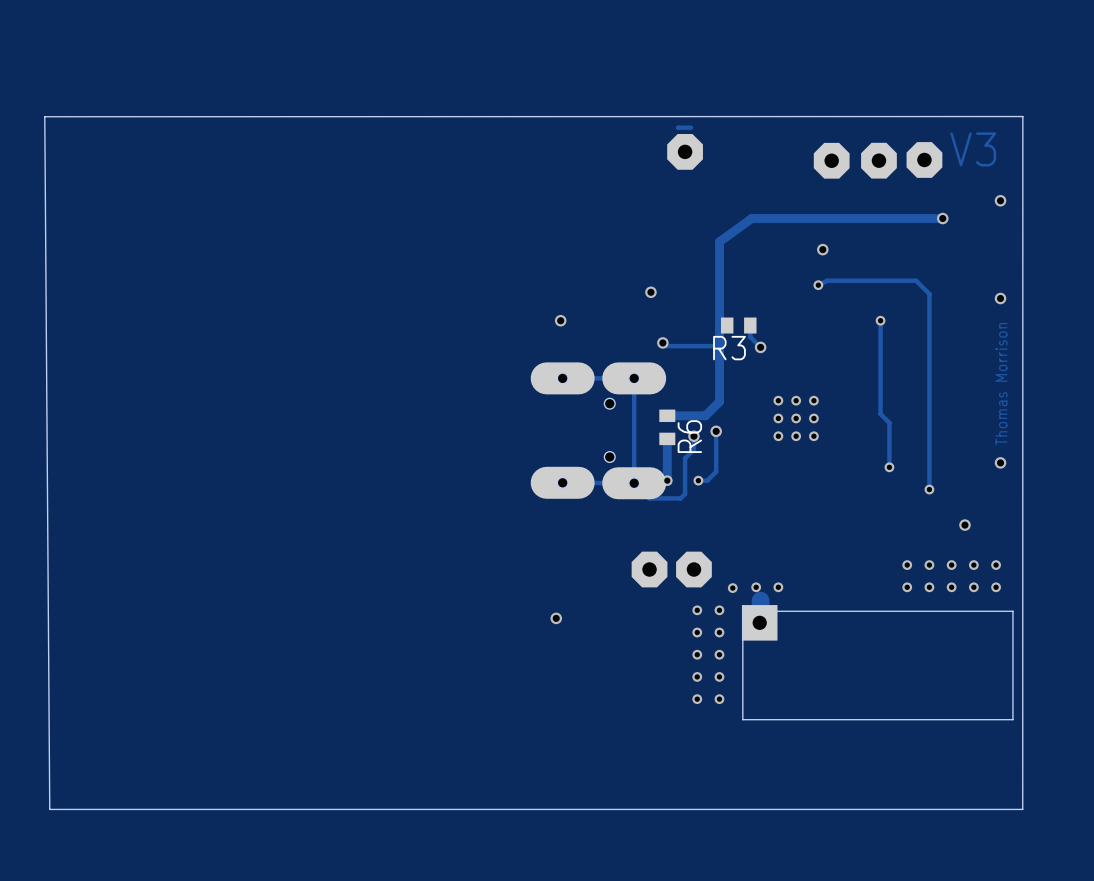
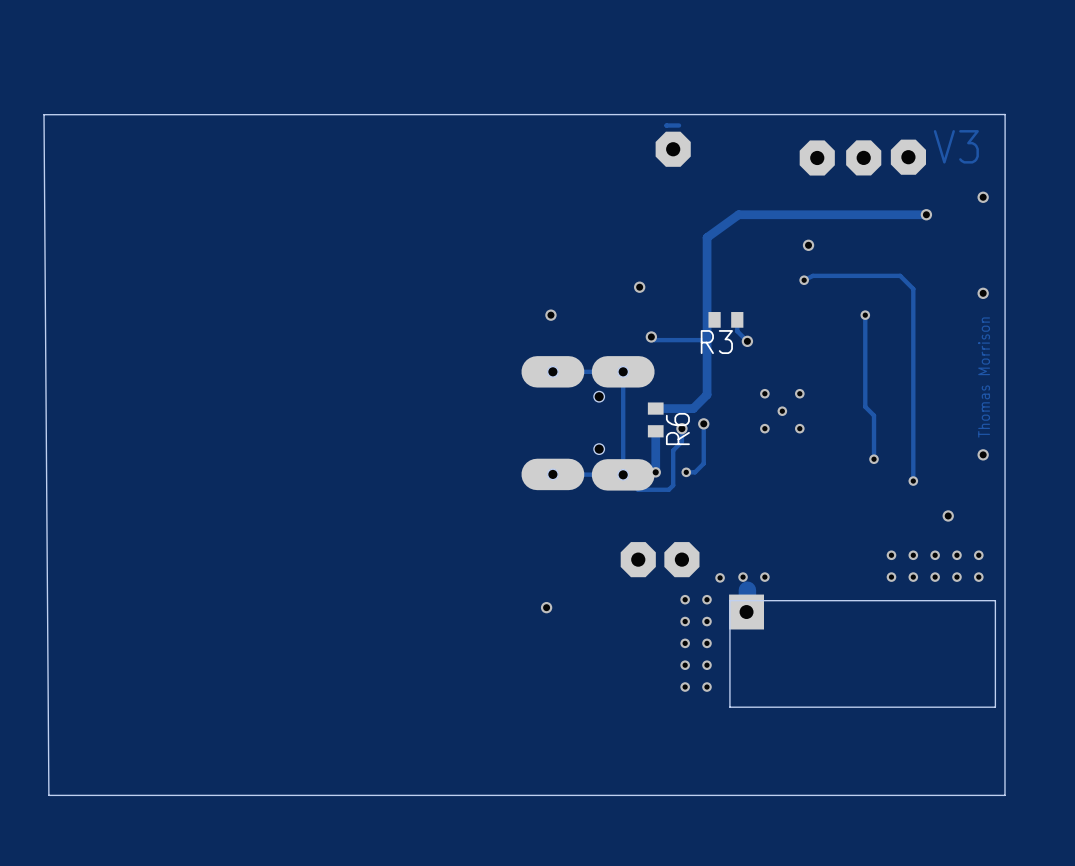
via: (796, 400) -> none
via: (778, 418) -> none
via: (813, 418) -> none
via: (796, 436) -> none

